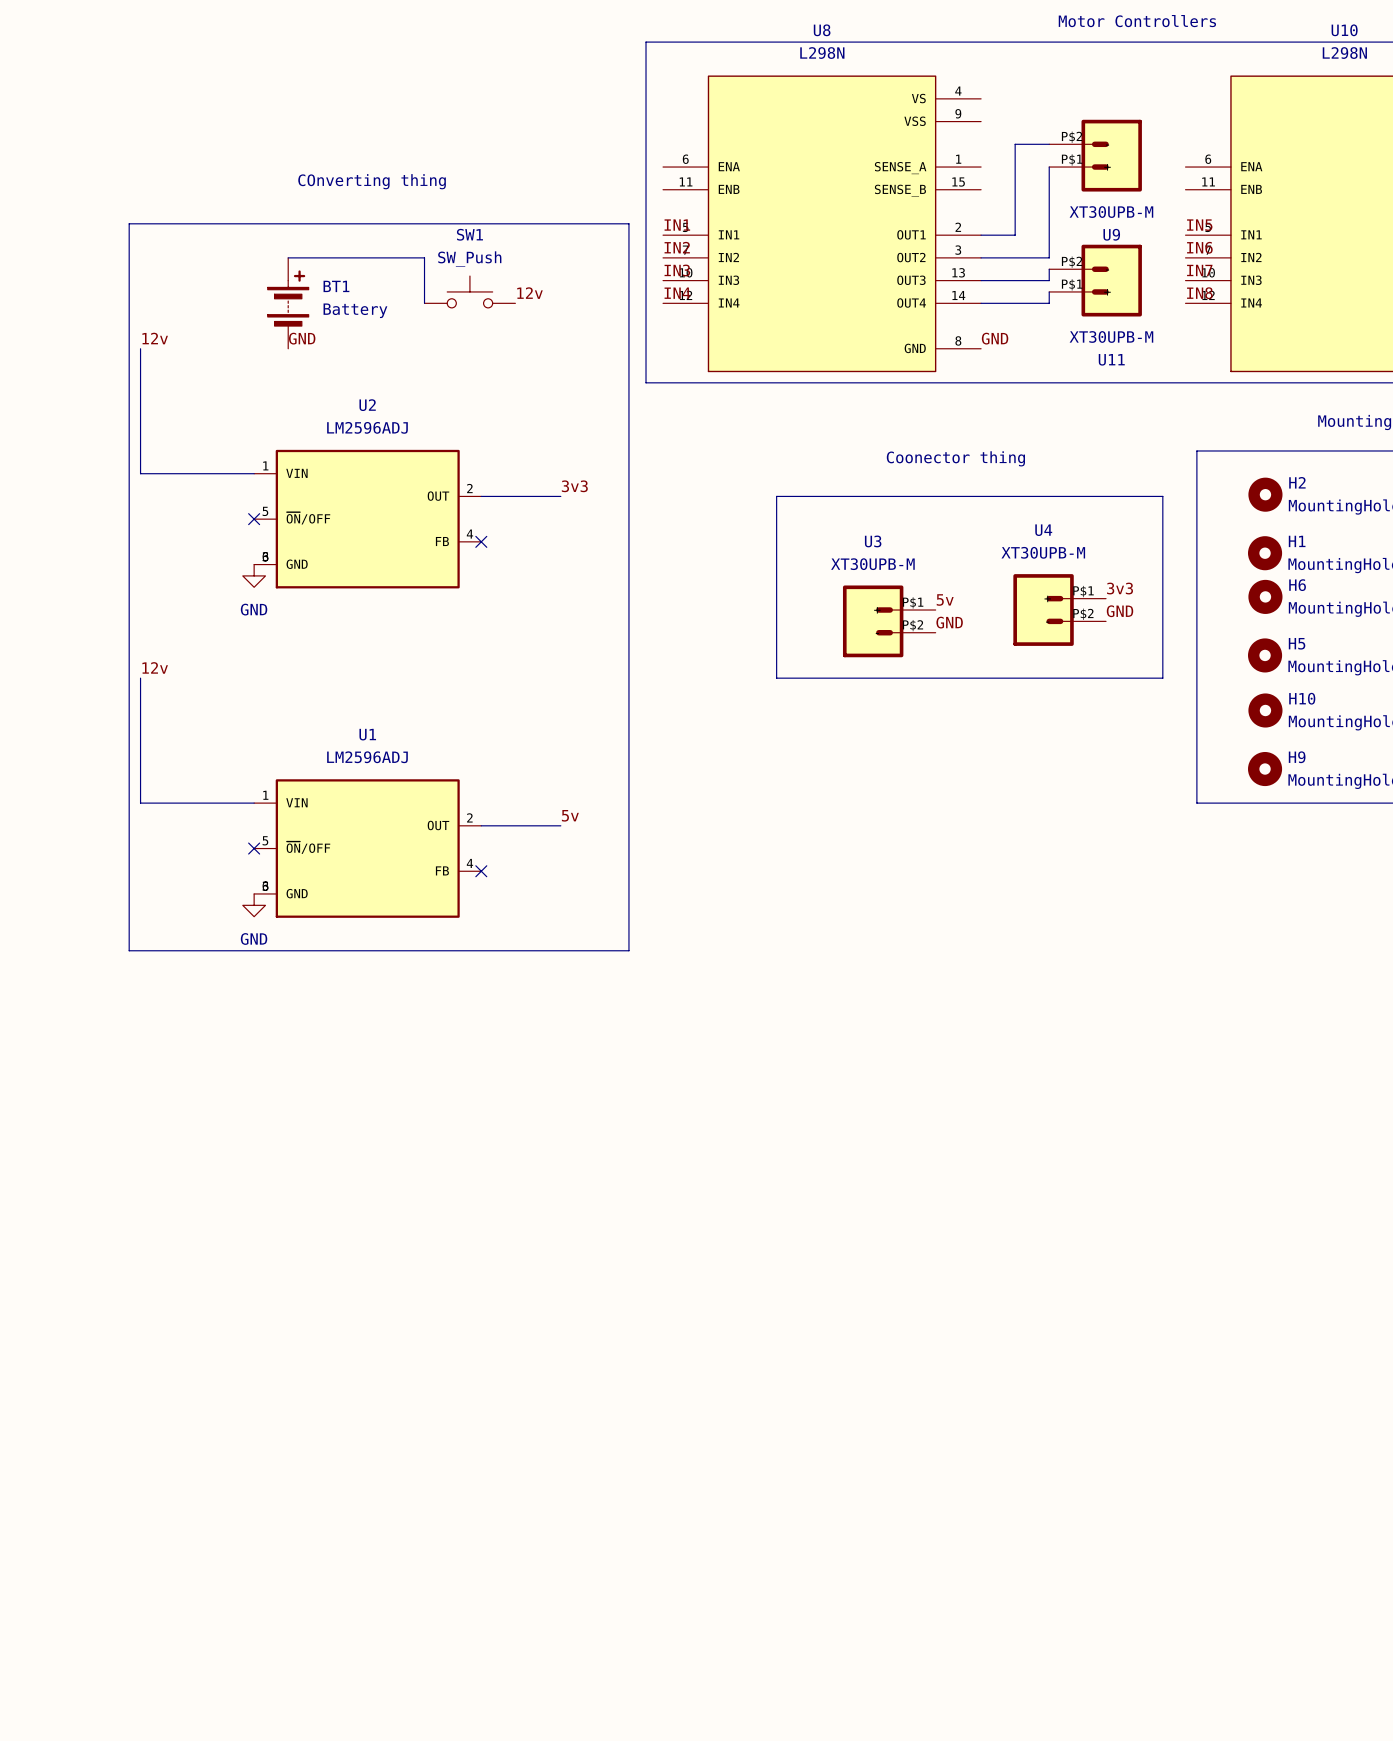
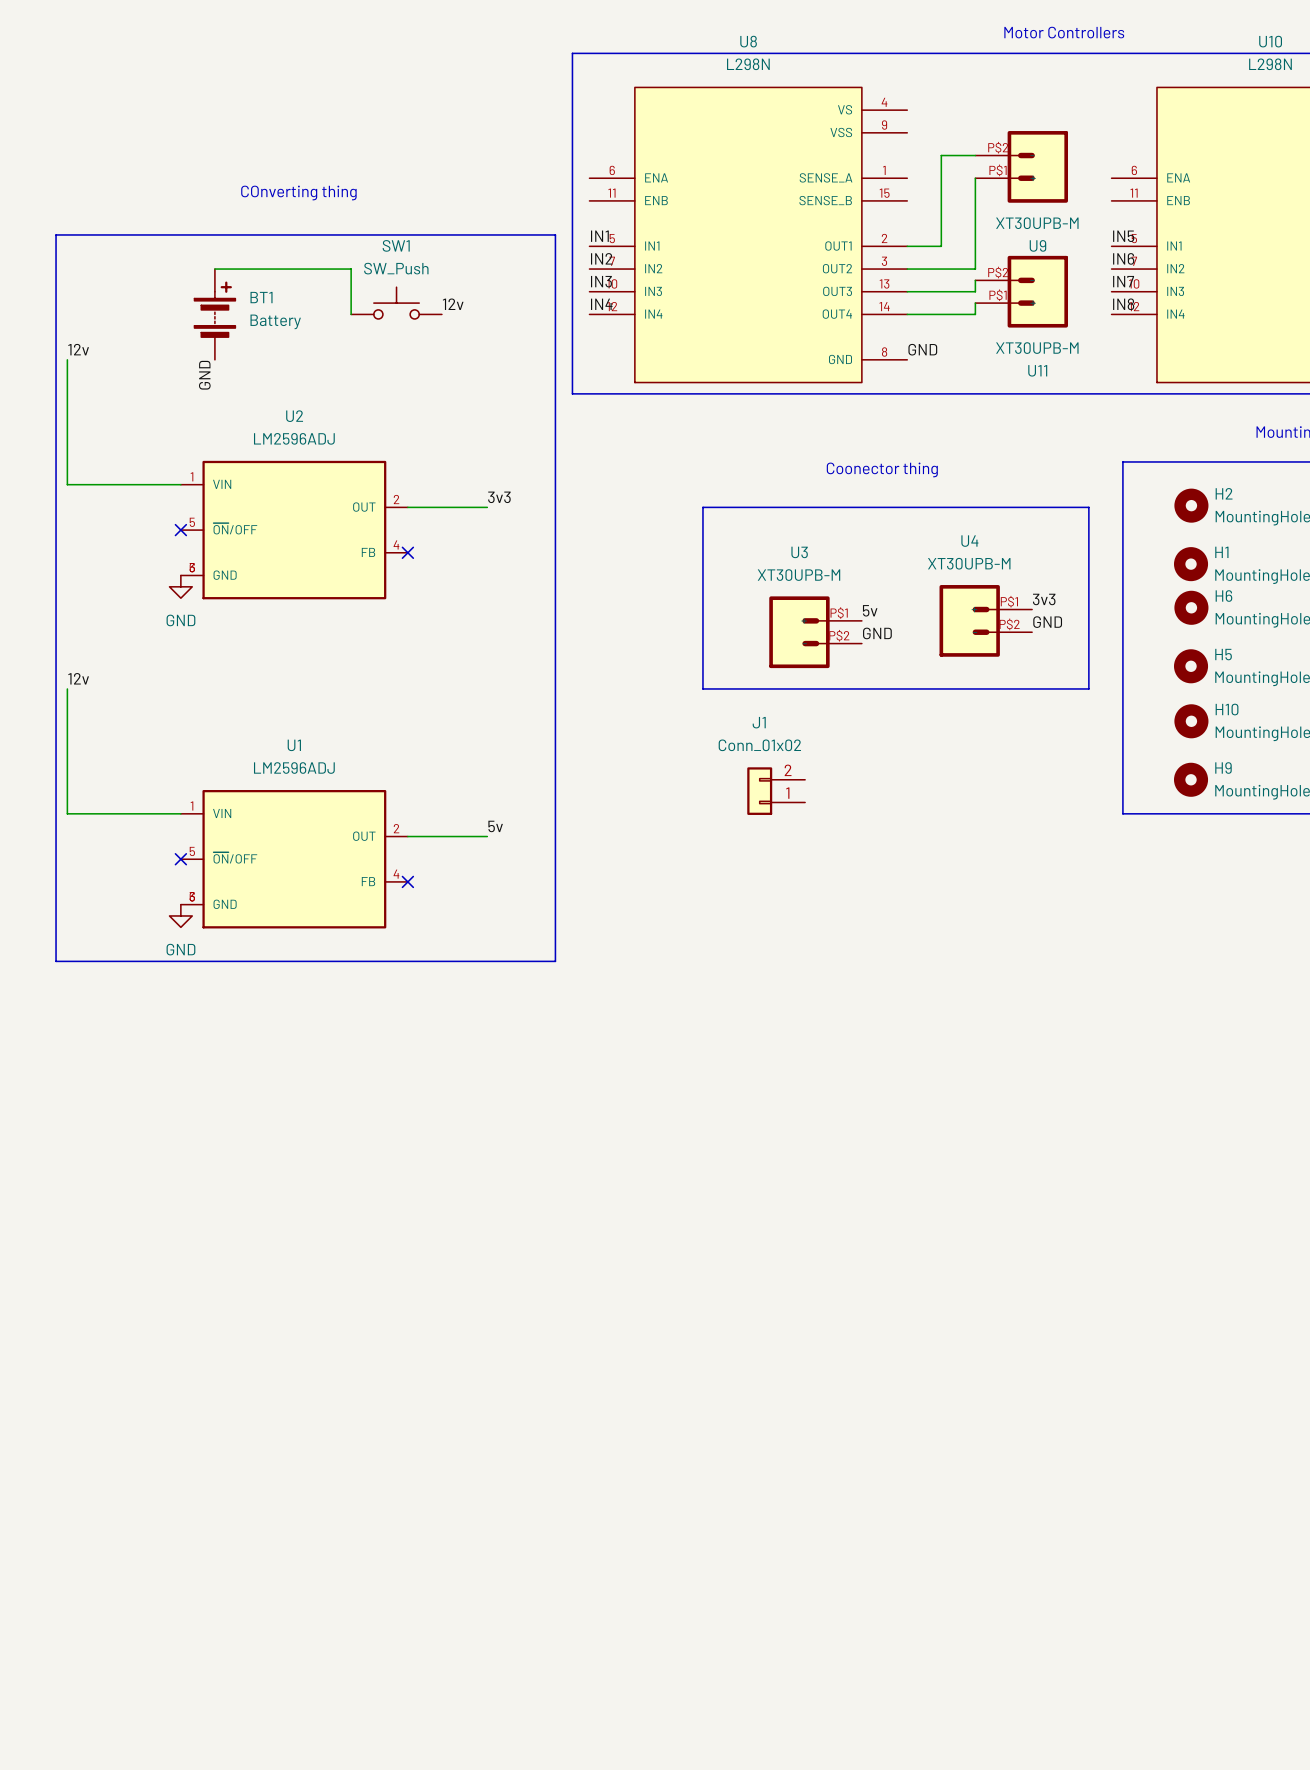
label rotation: 0° (302, 338) -> 90° counterclockwise (204, 375)
label position: GND (302, 338) -> GND (204, 375)
J1: none -> Conn_01x02 (776, 791)

